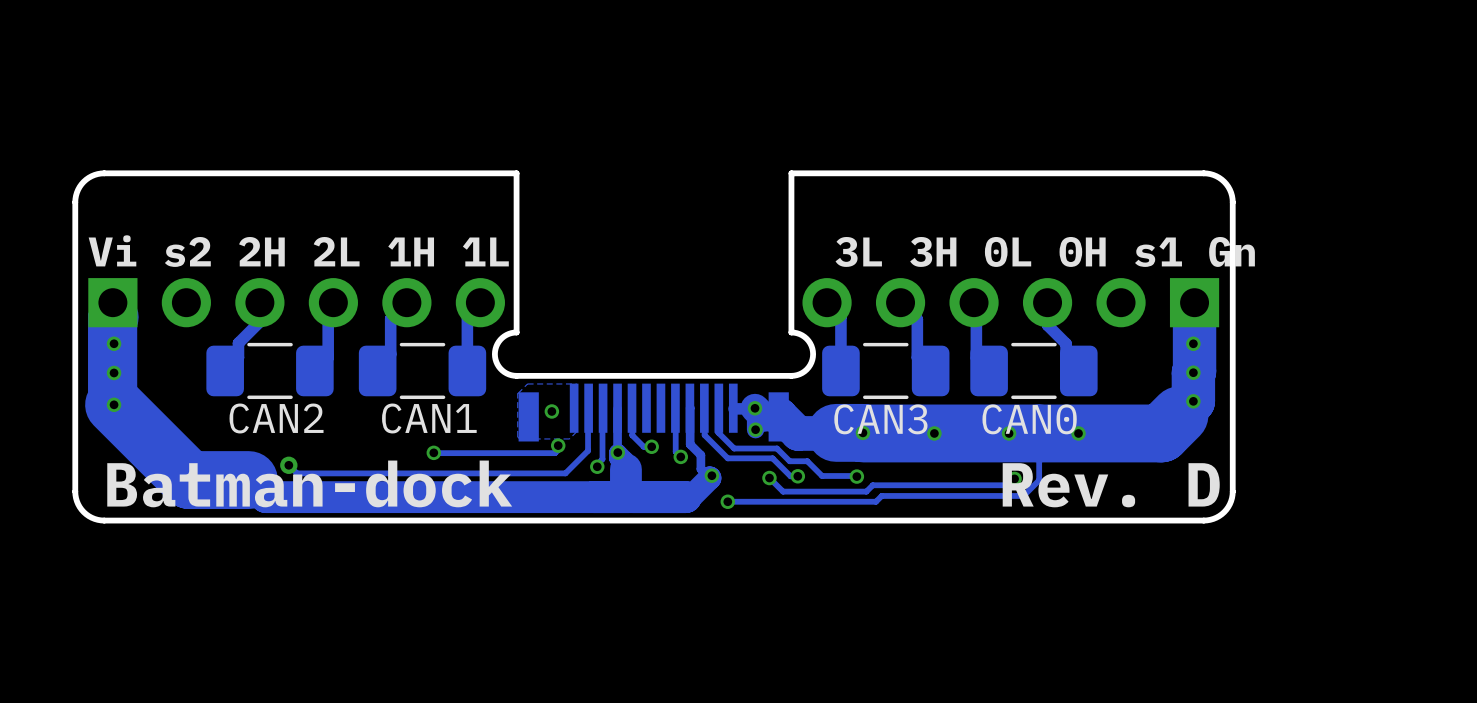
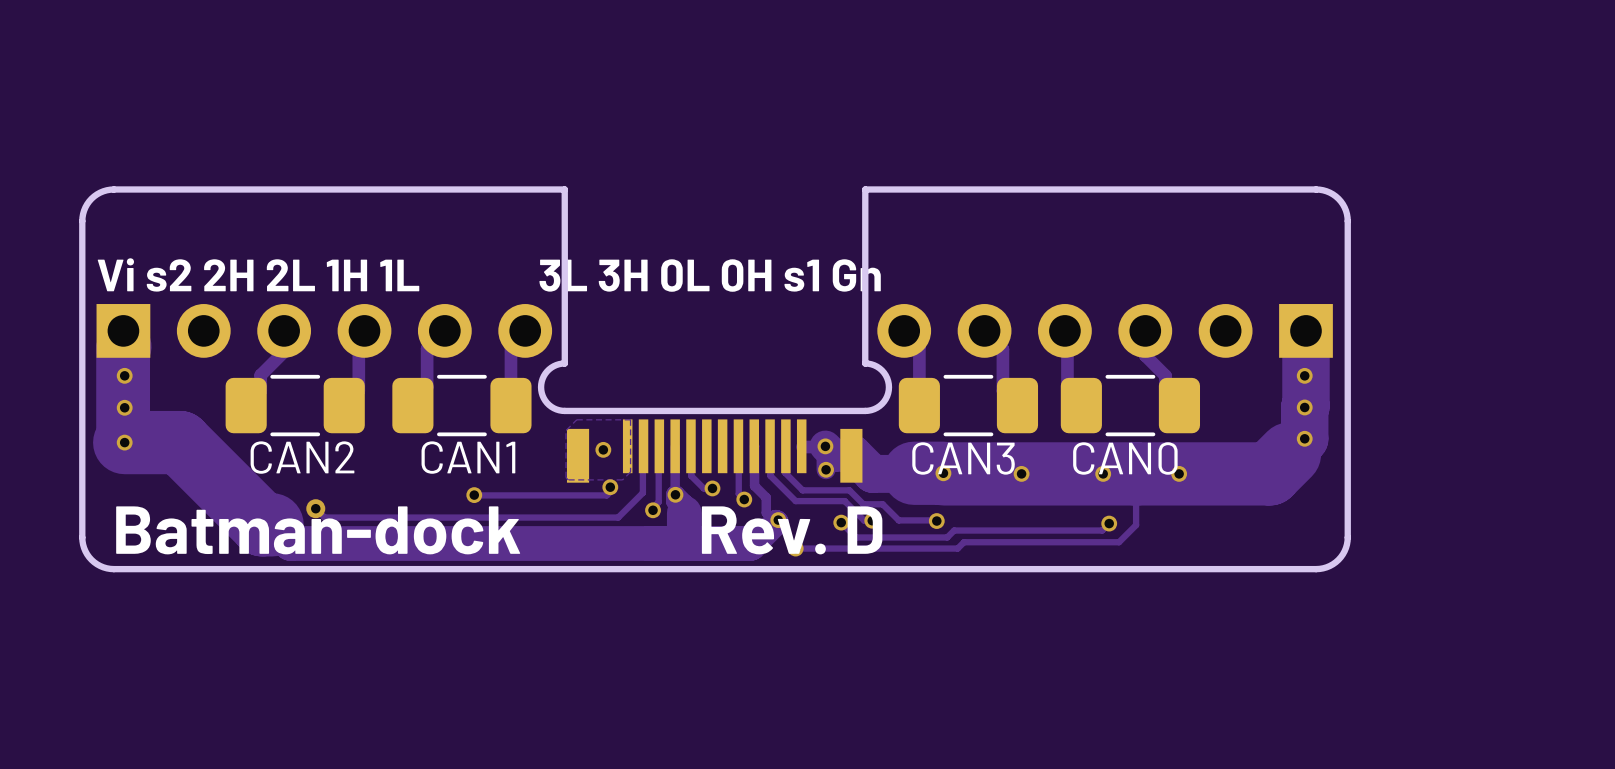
track: (114, 404) (189, 480) (239, 480) -> (124, 442) (180, 442) (262, 524)

